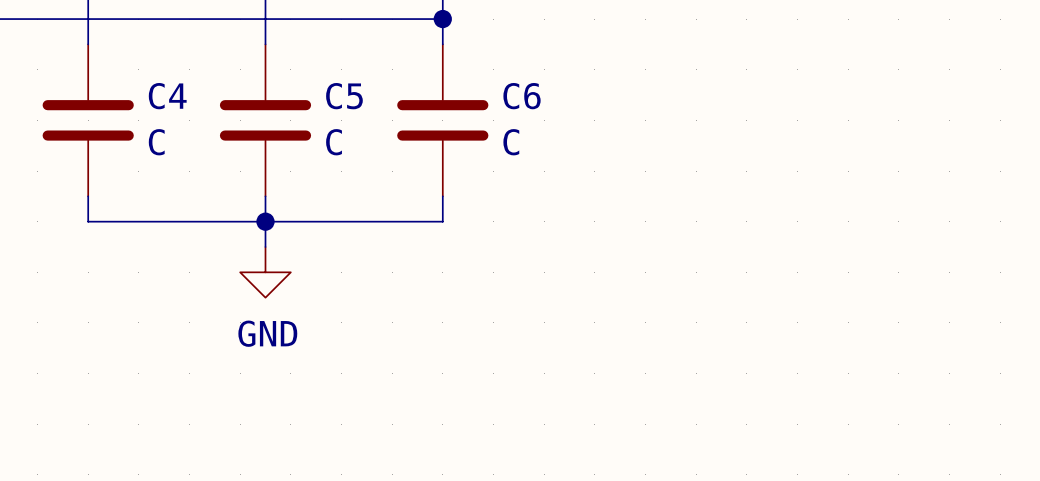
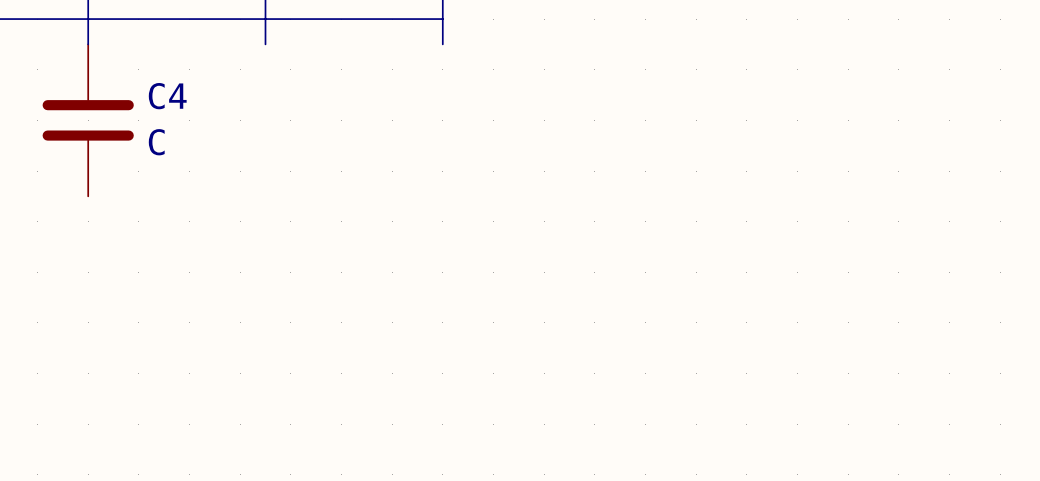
junction: (442, 19) -> none
C5: C (265, 120) -> none
C6: C (442, 120) -> none
wire: (88, 196) (88, 221) (442, 221) (442, 196) -> none
wire: (265, 196) (265, 247) -> none
junction: (265, 221) -> none
power symbol: GND (265, 272) -> none

